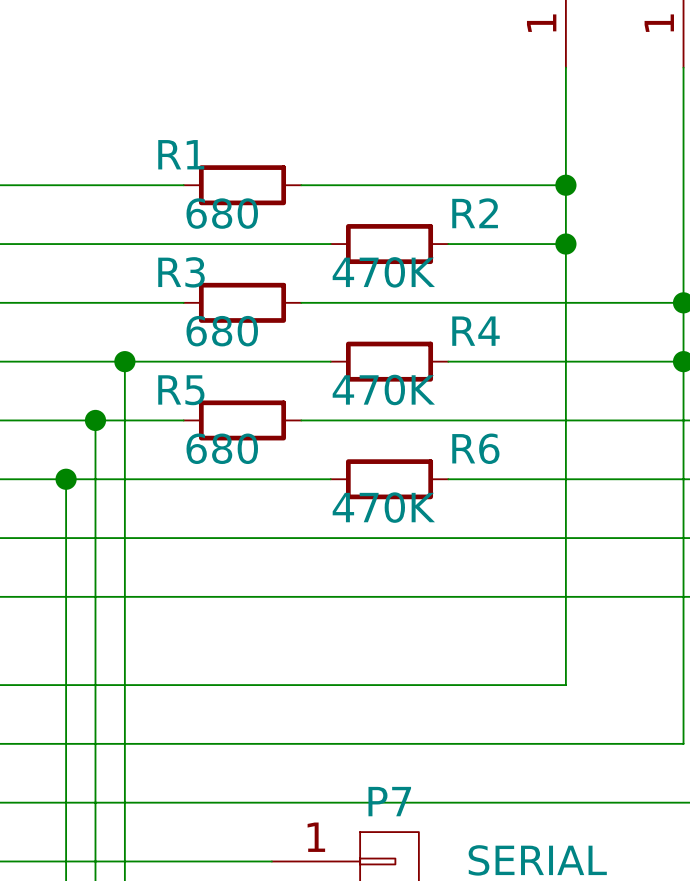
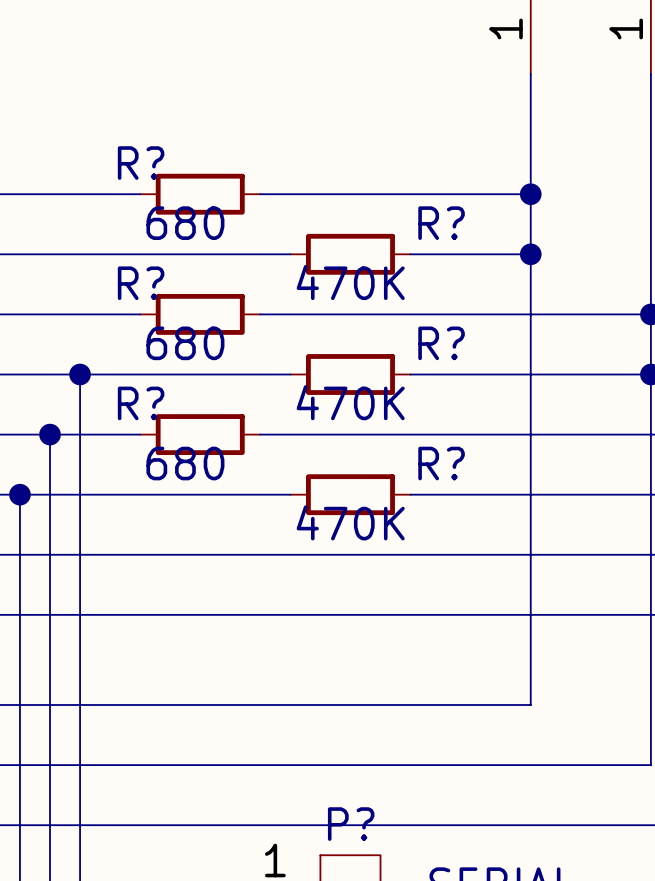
R1 name: R1 (181, 154) -> R? (141, 163)
R2 name: R2 (475, 213) -> R? (441, 223)
R3 name: R3 (181, 272) -> R? (141, 283)
R4 name: R4 (476, 331) -> R? (441, 343)
R5 name: R5 (181, 390) -> R? (141, 403)
R6 name: R6 (475, 448) -> R? (441, 463)
P7 name: P7 (389, 801) -> P? (351, 824)

